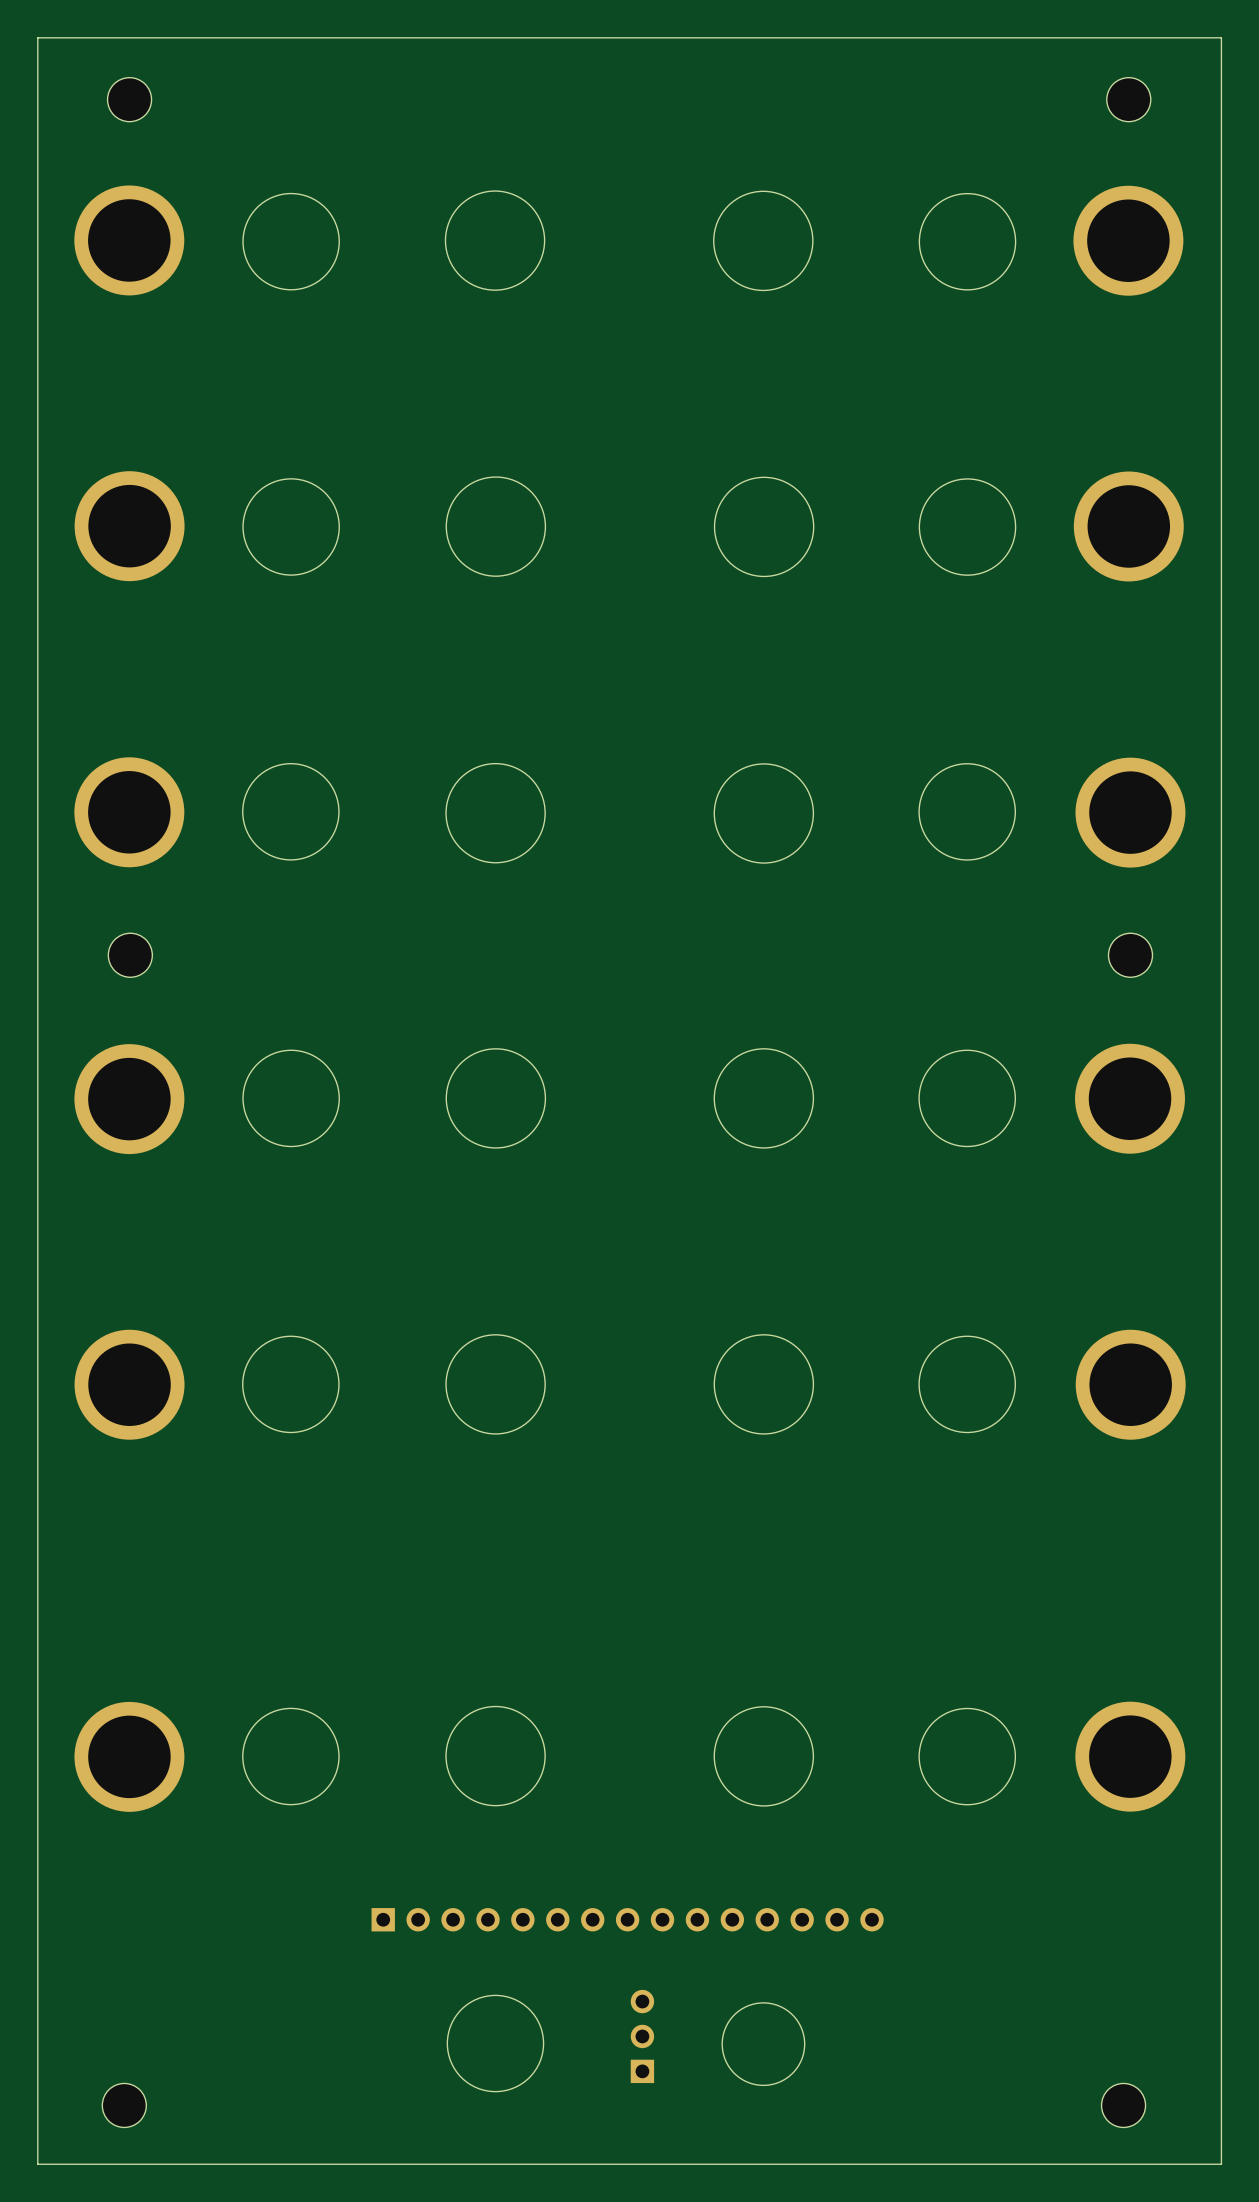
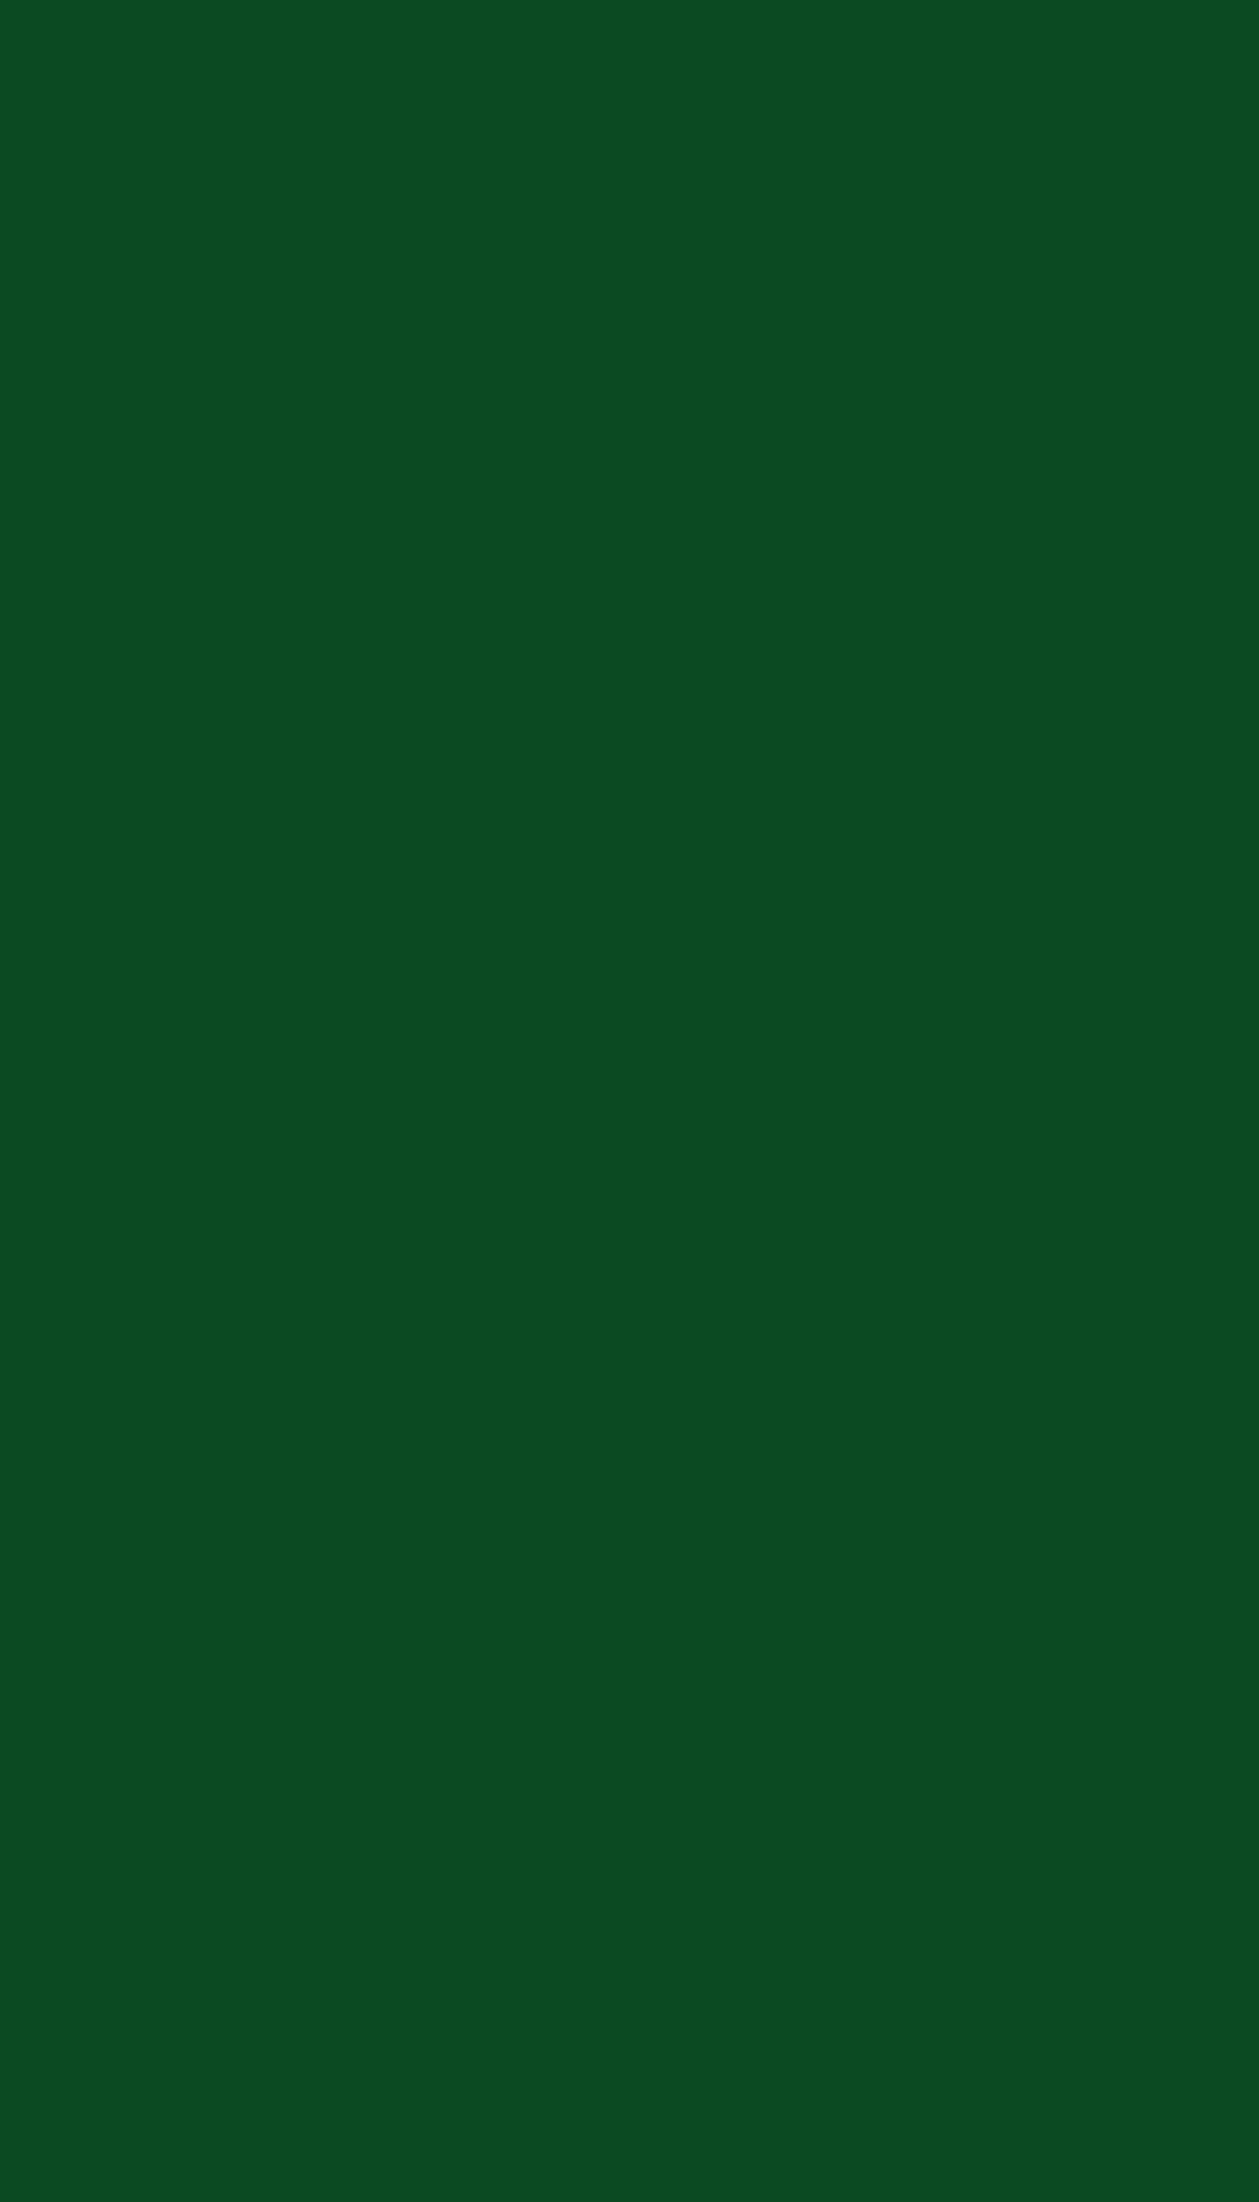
board edge: (1221, 37) (37, 37) (37, 2164) (1221, 2164) (1221, 37) -> none
part: (129, 99) -> none
part: (1128, 99) -> none
round board edge: [445, 190, 545, 291] -> none
round board edge: [713, 190, 814, 291] -> none
round board edge: [242, 193, 340, 291] -> none
round board edge: [919, 193, 1016, 291] -> none
part: (129, 240) -> none
part: (1128, 240) -> none
round board edge: [445, 476, 546, 577] -> none
round board edge: [714, 477, 815, 577] -> none
round board edge: [242, 478, 340, 576] -> none
round board edge: [919, 478, 1016, 576] -> none
part: (129, 526) -> none
part: (1128, 526) -> none
round board edge: [242, 763, 340, 861] -> none
round board edge: [445, 763, 546, 864] -> none
round board edge: [713, 763, 814, 864] -> none
round board edge: [918, 763, 1016, 861] -> none
part: (129, 812) -> none
part: (1130, 812) -> none
part: (130, 955) -> none
part: (1130, 955) -> none
round board edge: [445, 1048, 546, 1149] -> none
round board edge: [713, 1048, 814, 1149] -> none
round board edge: [242, 1049, 340, 1147] -> none
round board edge: [918, 1049, 1016, 1147] -> none
part: (1130, 1098) -> none
part: (129, 1099) -> none
round board edge: [445, 1334, 546, 1435] -> none
round board edge: [713, 1334, 814, 1435] -> none
round board edge: [242, 1335, 340, 1433] -> none
round board edge: [918, 1335, 1016, 1433] -> none
part: (129, 1384) -> none
part: (1130, 1384) -> none
round board edge: [445, 1706, 546, 1806] -> none
round board edge: [713, 1706, 814, 1807] -> none
round board edge: [242, 1708, 340, 1805] -> none
round board edge: [918, 1708, 1016, 1806] -> none
part: (129, 1756) -> none
part: (1130, 1756) -> none
part: (627, 1919) -> none
round board edge: [447, 1995, 544, 2092] -> none
round board edge: [721, 2002, 806, 2086] -> none
part: (642, 2036) -> none
part: (124, 2105) -> none
part: (1123, 2105) -> none

